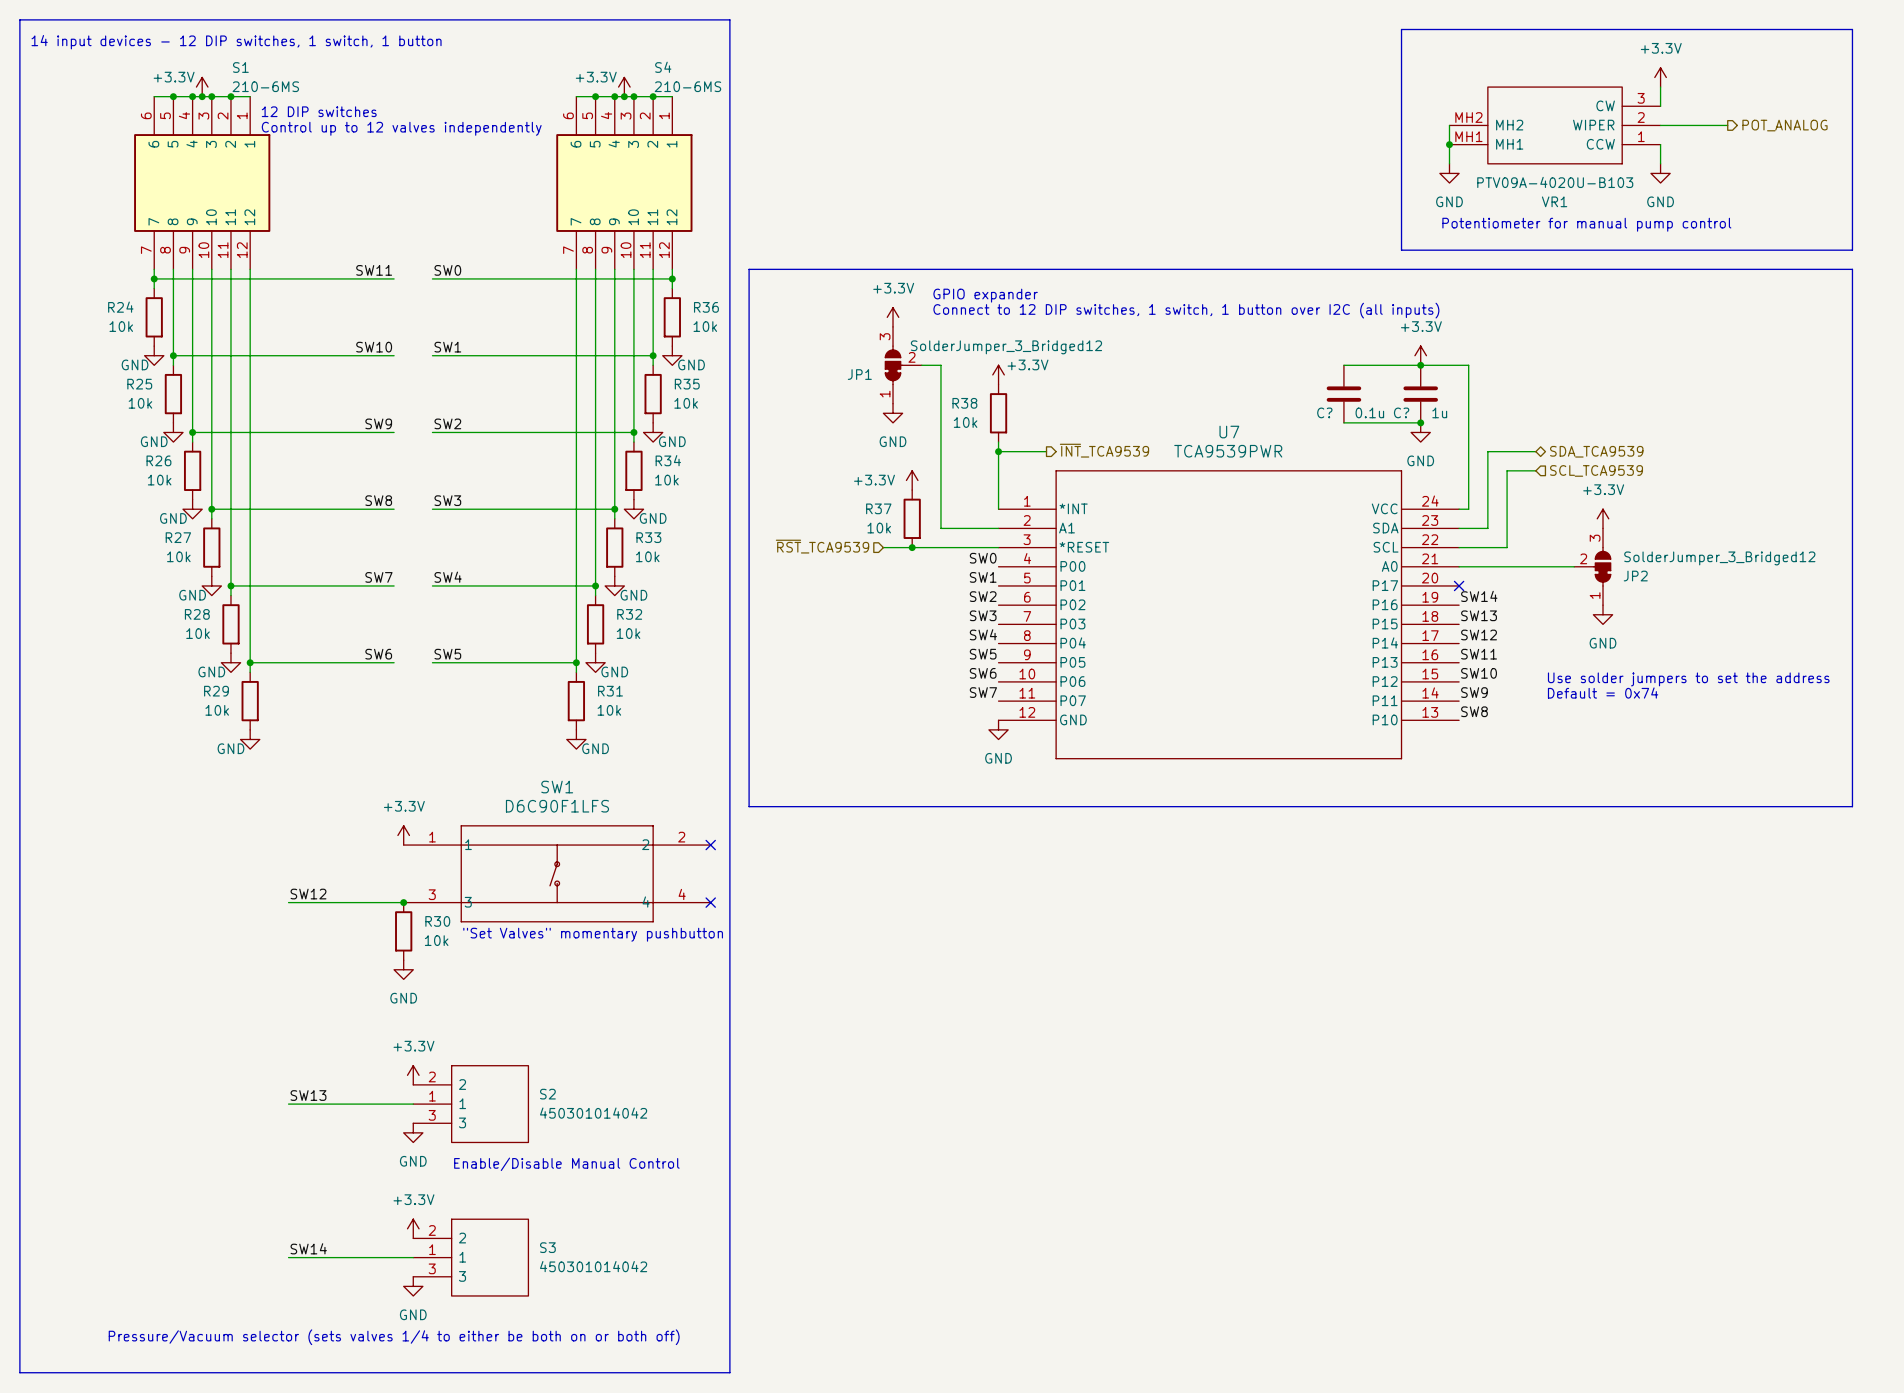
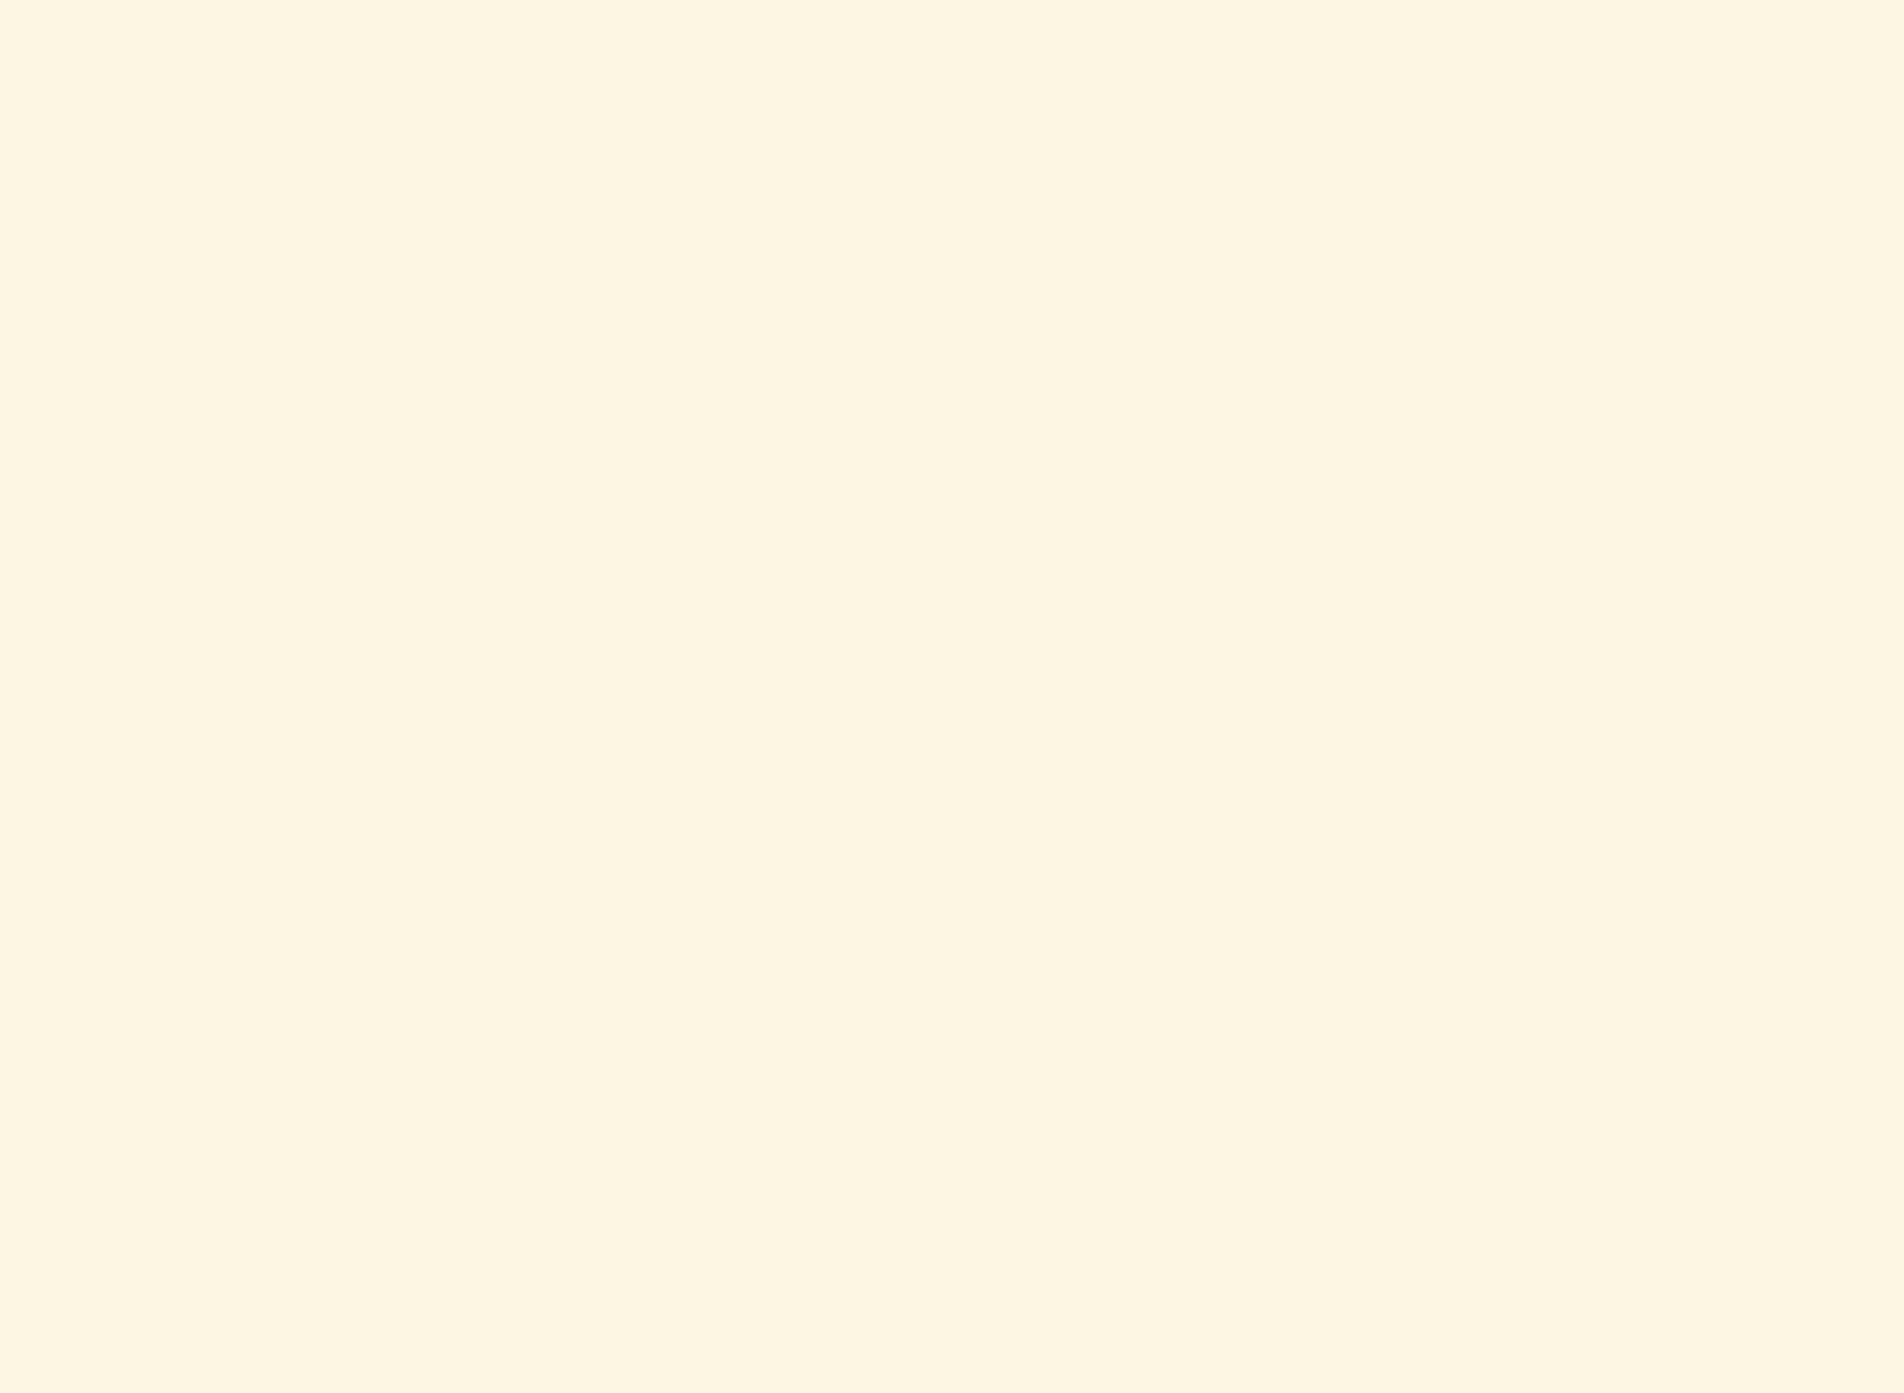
line: (19, 19) (729, 19) (729, 1372) (19, 1372) (19, 19) -> none
line: (1401, 29) (1852, 29) (1852, 250) (1401, 250) (1401, 29) -> none
text: 14 input devices - 12 DIP switches, 1 switch, 1 button (236, 42) -> none
power symbol: +3.3V (1660, 77) -> none
power symbol: +3.3V (202, 87) -> none
power symbol: +3.3V (624, 87) -> none
wire: (1660, 87) (1660, 106) -> none
wire: (154, 96) (250, 96) -> none
junction: (173, 96) -> none
junction: (192, 96) -> none
junction: (202, 96) -> none
junction: (211, 96) -> none
junction: (230, 96) -> none
wire: (576, 96) (672, 96) -> none
junction: (595, 96) -> none
junction: (614, 96) -> none
junction: (624, 96) -> none
junction: (633, 96) -> none
junction: (653, 96) -> none
text: 12 DIP switches (319, 111) -> none
wire: (1449, 125) (1449, 163) -> none
VR1: PTV09A-4020U-B103 (1555, 125) -> none
wire: (1660, 125) (1727, 125) -> none
hierarchical label: POT_ANALOG (1784, 125) -> none
text: Control up to 12 valves independently (401, 128) -> none
junction: (1449, 144) -> none
wire: (1660, 144) (1660, 163) -> none
power symbol: GND (1449, 173) -> none
power symbol: GND (1660, 173) -> none
S1: 210-6MS (202, 183) -> none
S4: 210-6MS (624, 183) -> none
text: Potentiometer for manual pump control (1586, 224) -> none
wire: (154, 269) (154, 288) -> none
wire: (173, 269) (173, 365) -> none
wire: (192, 269) (192, 442) -> none
wire: (211, 269) (211, 518) -> none
wire: (230, 269) (230, 595) -> none
wire: (250, 269) (250, 672) -> none
wire: (576, 269) (576, 672) -> none
wire: (595, 269) (595, 595) -> none
wire: (614, 269) (614, 518) -> none
wire: (633, 269) (633, 442) -> none
wire: (653, 269) (653, 365) -> none
wire: (672, 269) (672, 288) -> none
line: (749, 269) (1852, 269) (1852, 806) (749, 806) (749, 269) -> none
label: SW11 (374, 270) -> none
label: SW0 (447, 270) -> none
wire: (154, 278) (394, 278) -> none
junction: (154, 278) -> none
wire: (432, 278) (672, 278) -> none
junction: (672, 278) -> none
text: GPIO expander (985, 295) -> none
text: Connect to 12 DIP switches, 1 switch, 1 button over I2C (all inputs) (1186, 310) -> none
R24: 10k (154, 317) -> none
R36: 10k (672, 317) -> none
power symbol: +3.3V (893, 317) -> none
label: SW10 (374, 347) -> none
label: SW1 (447, 347) -> none
power symbol: GND (154, 355) -> none
wire: (173, 355) (394, 355) -> none
junction: (173, 355) -> none
wire: (432, 355) (653, 355) -> none
junction: (653, 355) -> none
power symbol: GND (672, 355) -> none
power symbol: +3.3V (1420, 355) -> none
JP1: SolderJumper_3_Bridged12 (903, 365) -> none
wire: (921, 365) (940, 365) (940, 528) (998, 528) -> none
wire: (1343, 365) (1468, 365) (1468, 509) (1459, 509) -> none
junction: (1420, 365) -> none
power symbol: +3.3V (998, 374) -> none
R25: 10k (173, 394) -> none
R35: 10k (653, 394) -> none
C?: 0.1u (1343, 394) -> none
C?: 1u (1420, 394) -> none
power symbol: GND (893, 413) -> none
R38: 10k (998, 413) -> none
wire: (1343, 422) (1420, 422) -> none
junction: (1420, 422) -> none
label: SW9 (378, 423) -> none
label: SW2 (447, 423) -> none
power symbol: GND (173, 432) -> none
wire: (192, 432) (394, 432) -> none
junction: (192, 432) -> none
wire: (432, 432) (633, 432) -> none
junction: (633, 432) -> none
power symbol: GND (653, 432) -> none
power symbol: GND (1420, 432) -> none
wire: (998, 442) (998, 509) -> none
hierarchical label: ~{INT}_TCA9539 (1104, 450) -> none
wire: (998, 451) (1046, 451) -> none
junction: (998, 451) -> none
wire: (1535, 451) (1487, 451) (1487, 528) (1459, 528) -> none
hierarchical label: SDA_TCA9539 (1596, 451) -> none
R26: 10k (192, 470) -> none
R34: 10k (633, 470) -> none
wire: (1535, 470) (1507, 470) (1507, 547) (1459, 547) -> none
hierarchical label: SCL_TCA9539 (1596, 470) -> none
power symbol: +3.3V (912, 480) -> none
label: SW8 (378, 500) -> none
label: SW3 (447, 500) -> none
power symbol: GND (192, 509) -> none
wire: (211, 509) (394, 509) -> none
junction: (211, 509) -> none
wire: (432, 509) (614, 509) -> none
junction: (614, 509) -> none
power symbol: GND (633, 509) -> none
R37: 10k (912, 518) -> none
power symbol: +3.3V (1603, 518) -> none
hierarchical label: ~{RST}_TCA9539 (822, 546) -> none
R27: 10k (211, 547) -> none
R33: 10k (614, 547) -> none
wire: (883, 547) (998, 547) -> none
junction: (912, 547) -> none
label: SW0 (983, 558) -> none
wire: (1459, 566) (1574, 566) -> none
JP2: SolderJumper_3_Bridged12 (1592, 566) -> none
label: SW7 (378, 577) -> none
label: SW4 (448, 577) -> none
label: SW1 (983, 577) -> none
power symbol: GND (211, 585) -> none
wire: (230, 585) (394, 585) -> none
junction: (230, 585) -> none
wire: (432, 585) (595, 585) -> none
junction: (595, 585) -> none
power symbol: GND (614, 585) -> none
no-connect mark: (1459, 585) -> none
label: SW2 (983, 596) -> none
label: SW14 (1479, 596) -> none
U7: TCA9539PWR (1228, 614) -> none
power symbol: GND (1603, 614) -> none
label: SW3 (983, 615) -> none
label: SW13 (1479, 615) -> none
R28: 10k (230, 624) -> none
R32: 10k (595, 624) -> none
label: SW4 (983, 634) -> none
label: SW12 (1479, 634) -> none
label: SW6 (378, 654) -> none
label: SW5 (447, 654) -> none
label: SW5 (983, 654) -> none
label: SW11 (1479, 654) -> none
power symbol: GND (230, 662) -> none
wire: (250, 662) (394, 662) -> none
junction: (250, 662) -> none
wire: (432, 662) (576, 662) -> none
junction: (576, 662) -> none
power symbol: GND (595, 662) -> none
label: SW6 (983, 673) -> none
label: SW10 (1479, 673) -> none
text: Use solder jumpers to set the address (1688, 679) -> none
label: SW7 (983, 692) -> none
label: SW9 (1474, 692) -> none
text: Default = 0x74 (1603, 693) -> none
R29: 10k (250, 701) -> none
R31: 10k (576, 701) -> none
label: SW8 (1474, 711) -> none
power symbol: GND (998, 729) -> none
power symbol: GND (250, 739) -> none
power symbol: GND (576, 739) -> none
power symbol: +3.3V (403, 835) -> none
no-connect mark: (710, 845) -> none
SW1: D6C90F1LFS (557, 873) -> none
label: SW12 (308, 894) -> none
wire: (288, 902) (403, 902) -> none
junction: (403, 902) -> none
no-connect mark: (710, 902) -> none
R30: 10k (403, 931) -> none
text: "Set Valves" momentary pushbutton (593, 934) -> none
power symbol: GND (403, 969) -> none
power symbol: +3.3V (413, 1075) -> none
label: SW13 (308, 1095) -> none
wire: (288, 1104) (413, 1104) -> none
S2: 450301014042 (471, 1104) -> none
power symbol: GND (413, 1132) -> none
text: Enable/Disable Manual Control (566, 1164) -> none
power symbol: +3.3V (413, 1228) -> none
label: SW14 (308, 1248) -> none
wire: (288, 1257) (413, 1257) -> none
S3: 450301014042 (471, 1257) -> none
power symbol: GND (413, 1286) -> none
text: Pressure/Vacuum selector (sets valves 1/4 to either be both on or both off) (394, 1337) -> none

